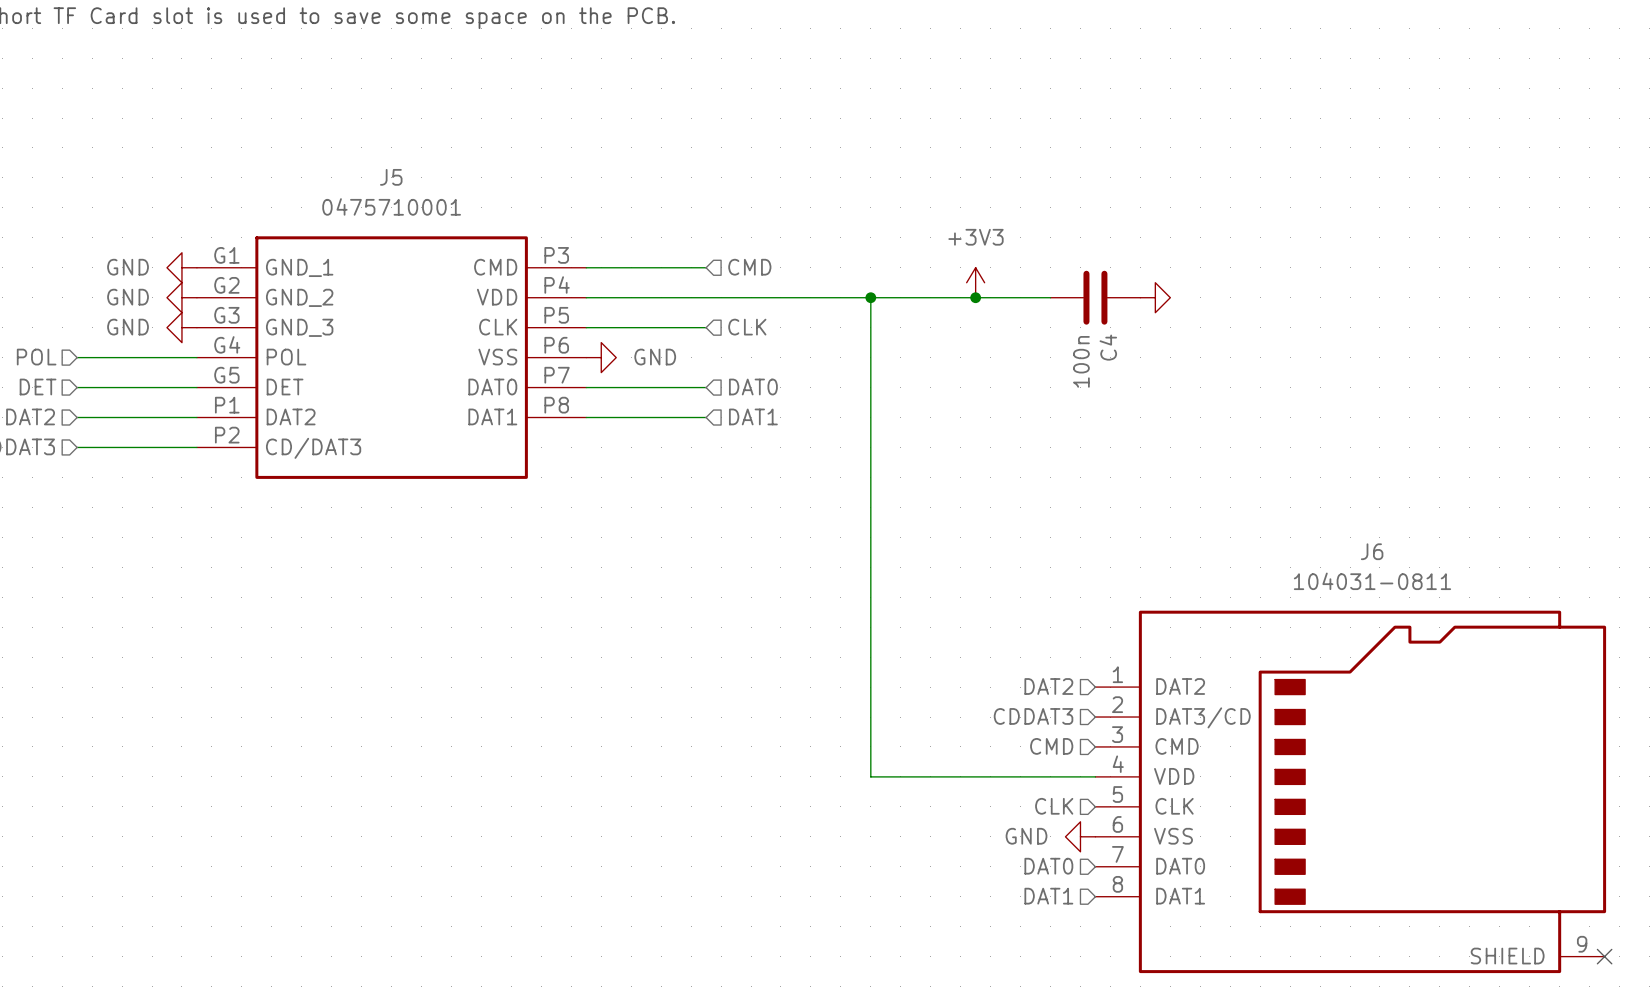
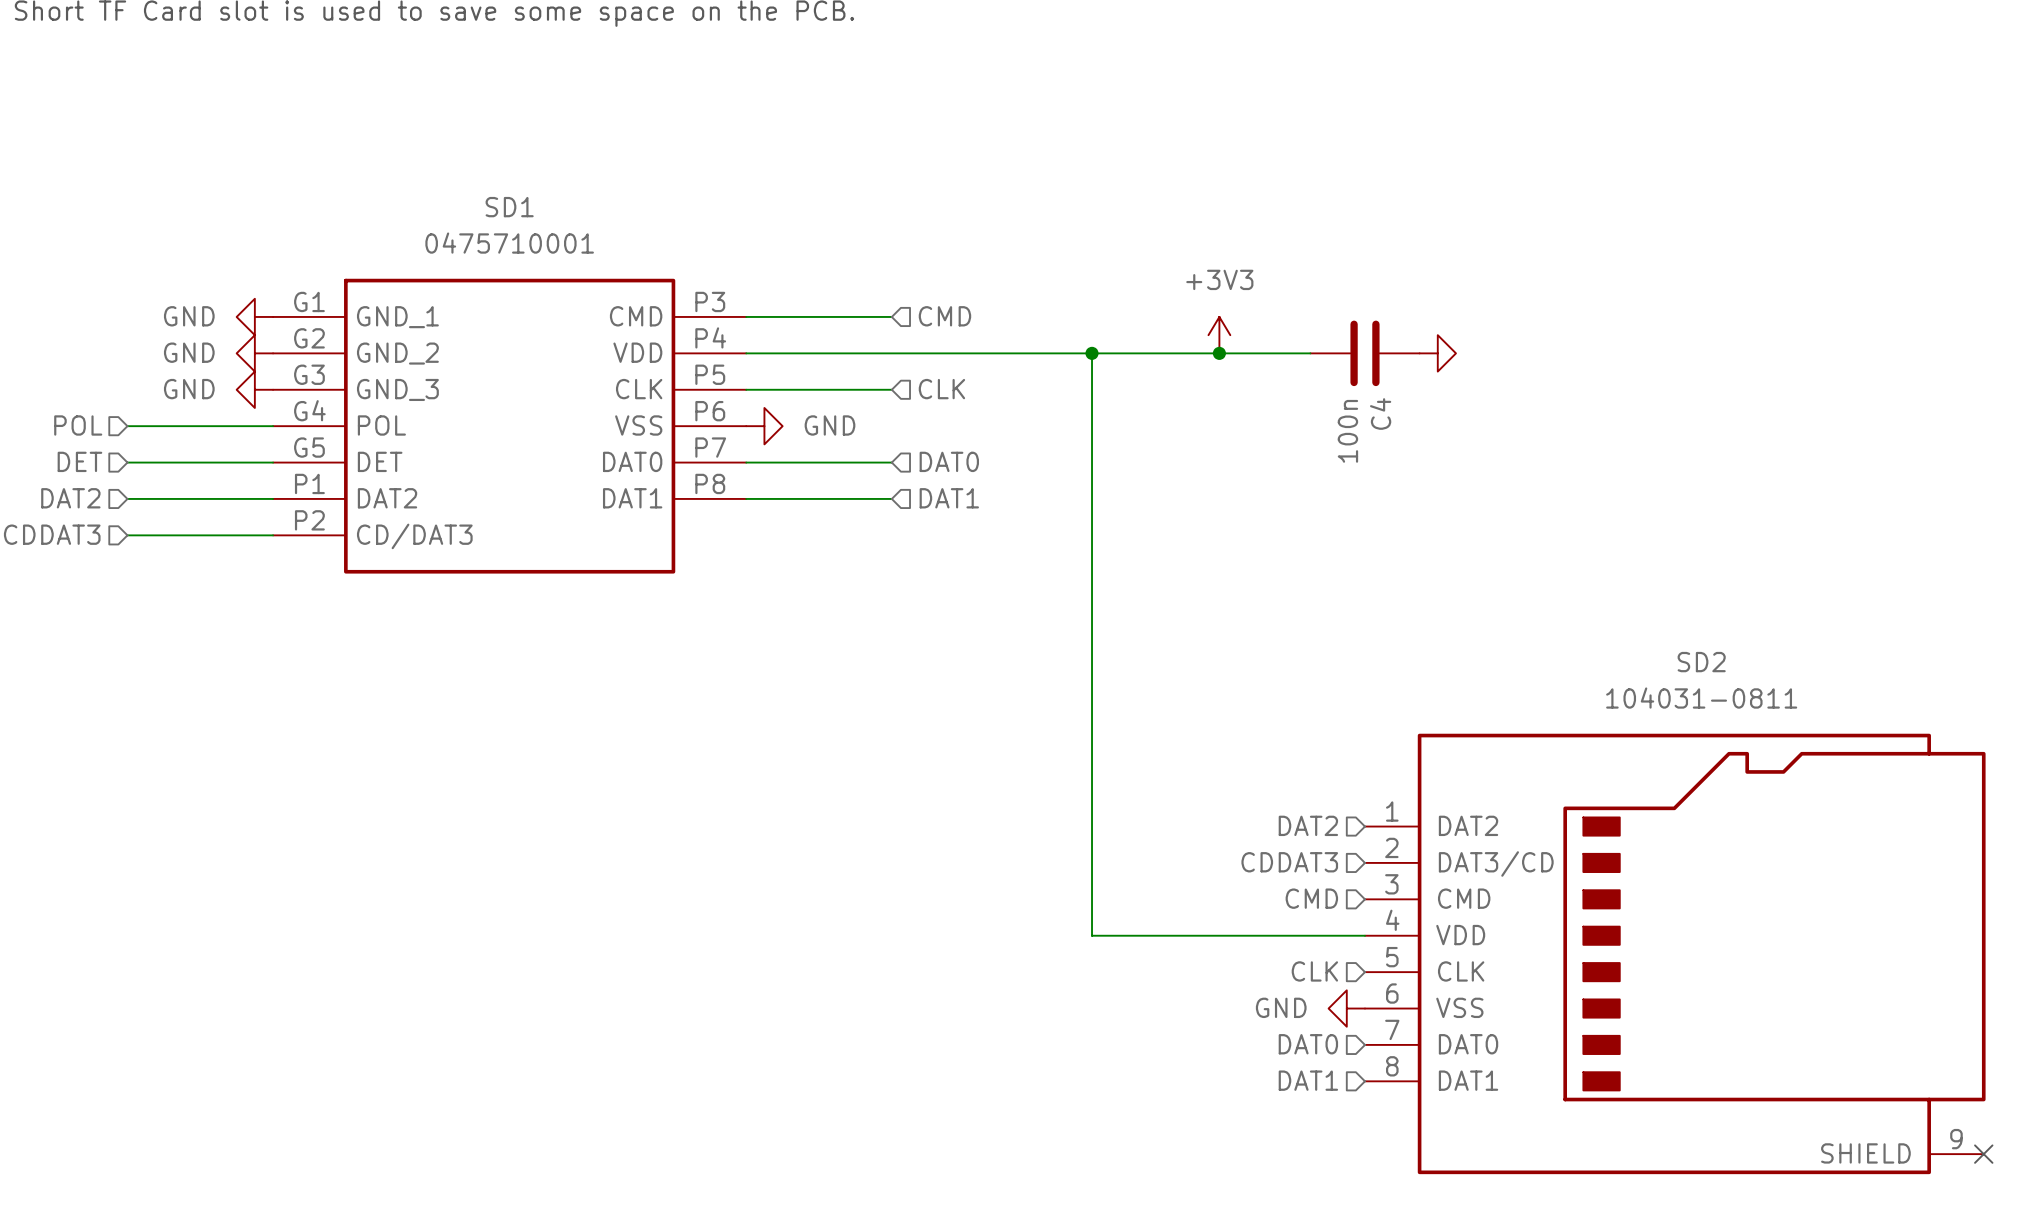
J5 name: J5 (391, 177) -> SD1 (509, 207)
J6 name: J6 (1372, 551) -> SD2 (1701, 662)

